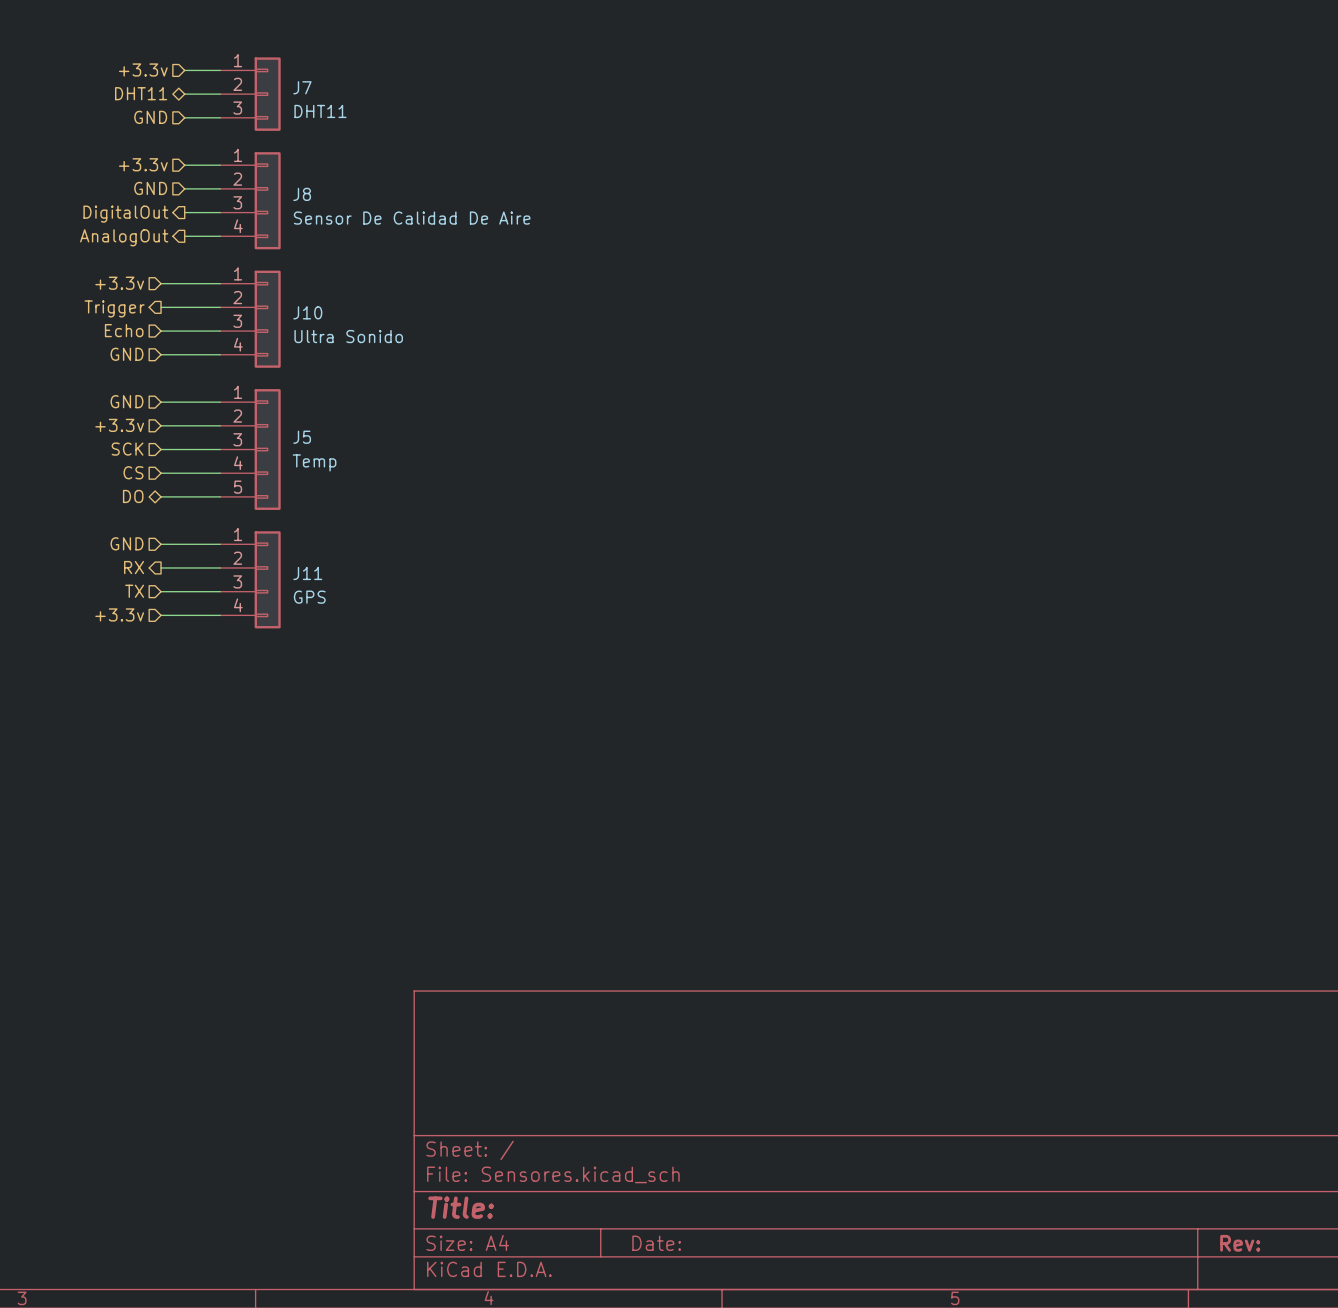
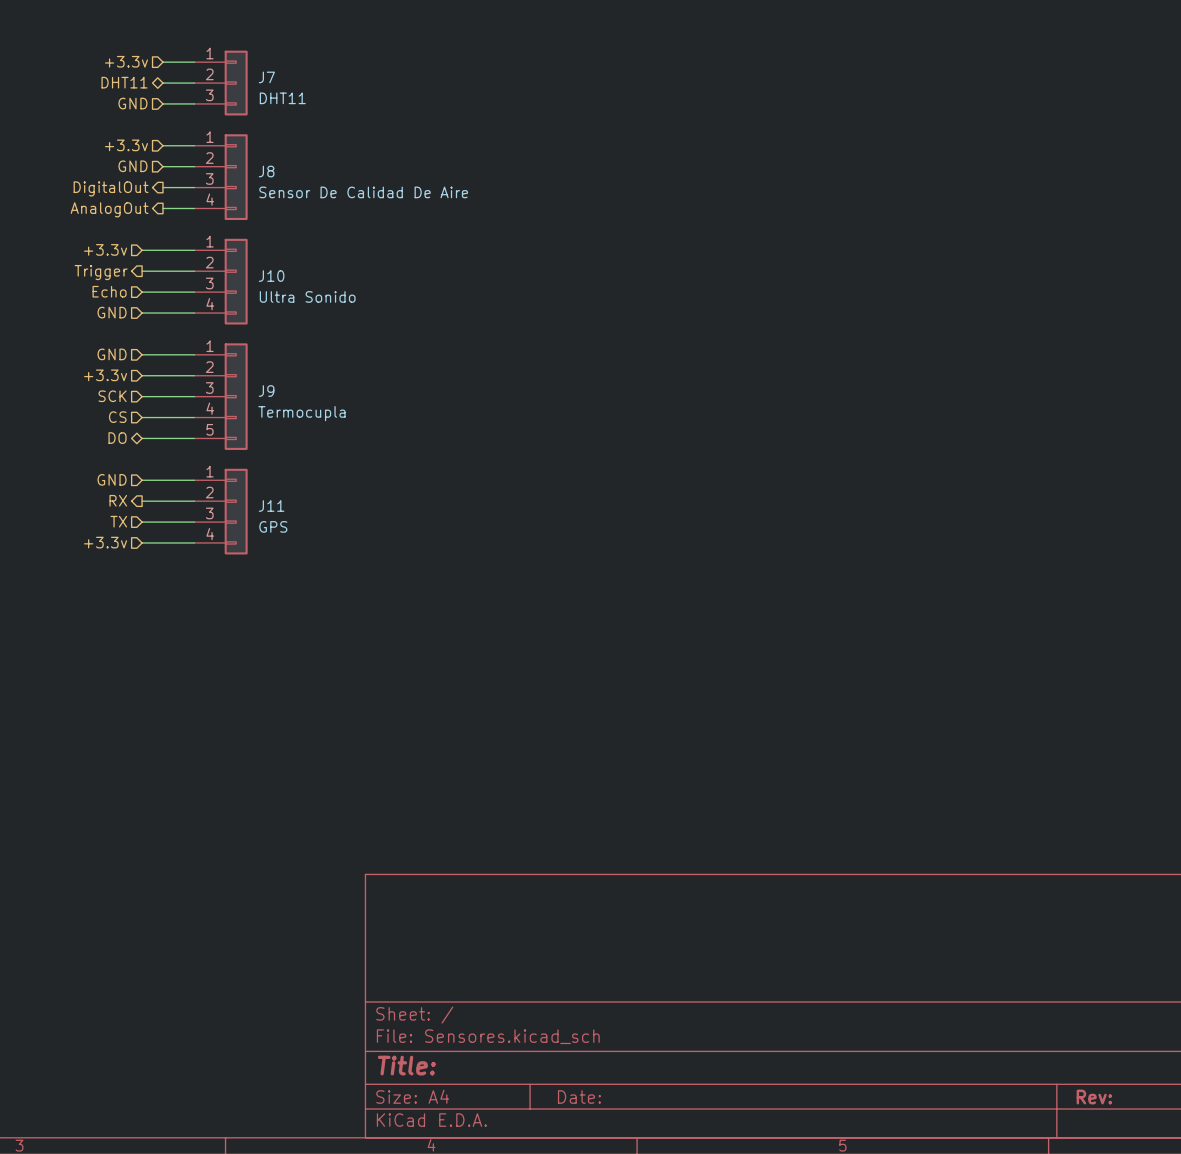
J5 name: J5 (302, 437) -> J9 (266, 391)
J5 value: Temp (314, 462) -> Termocupla (301, 413)

